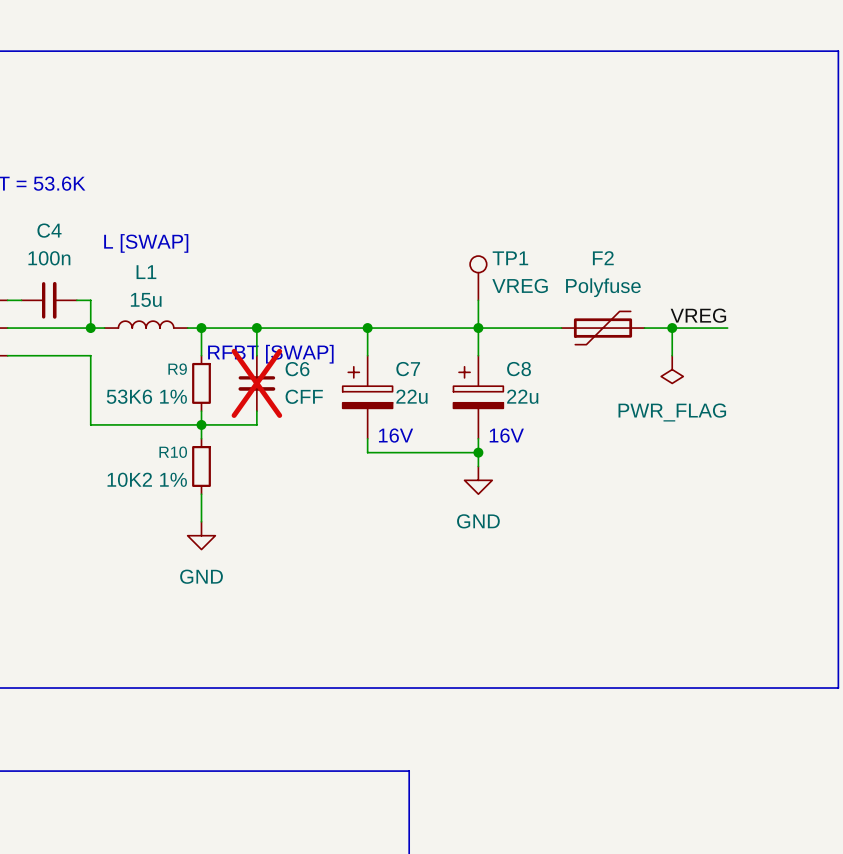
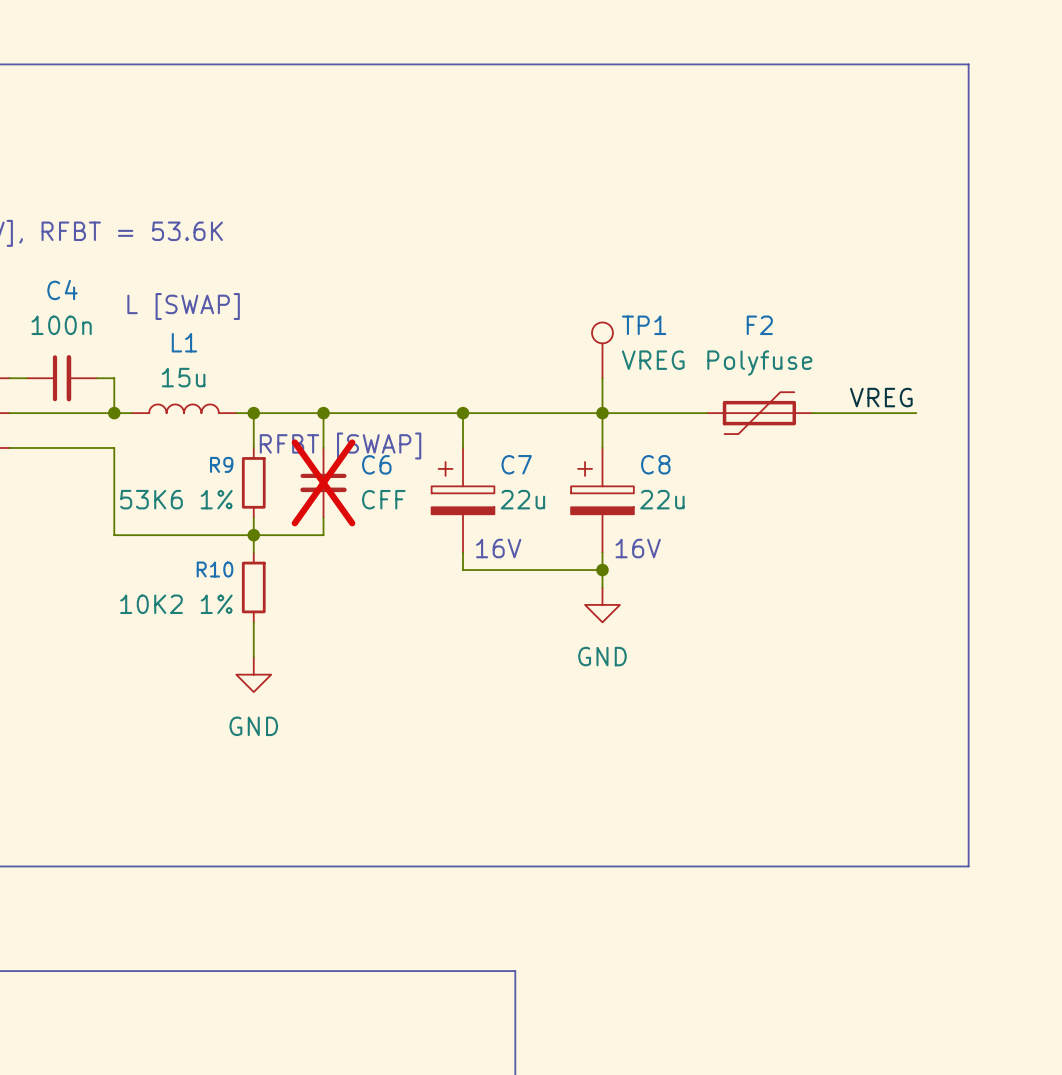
line: (769, 51) (838, 51) (838, 688) (769, 688) -> (968, 64) (968, 866)
wire: (672, 328) (672, 355) -> none
junction: (672, 328) -> none
power symbol: PWR_FLAG (672, 369) -> none

